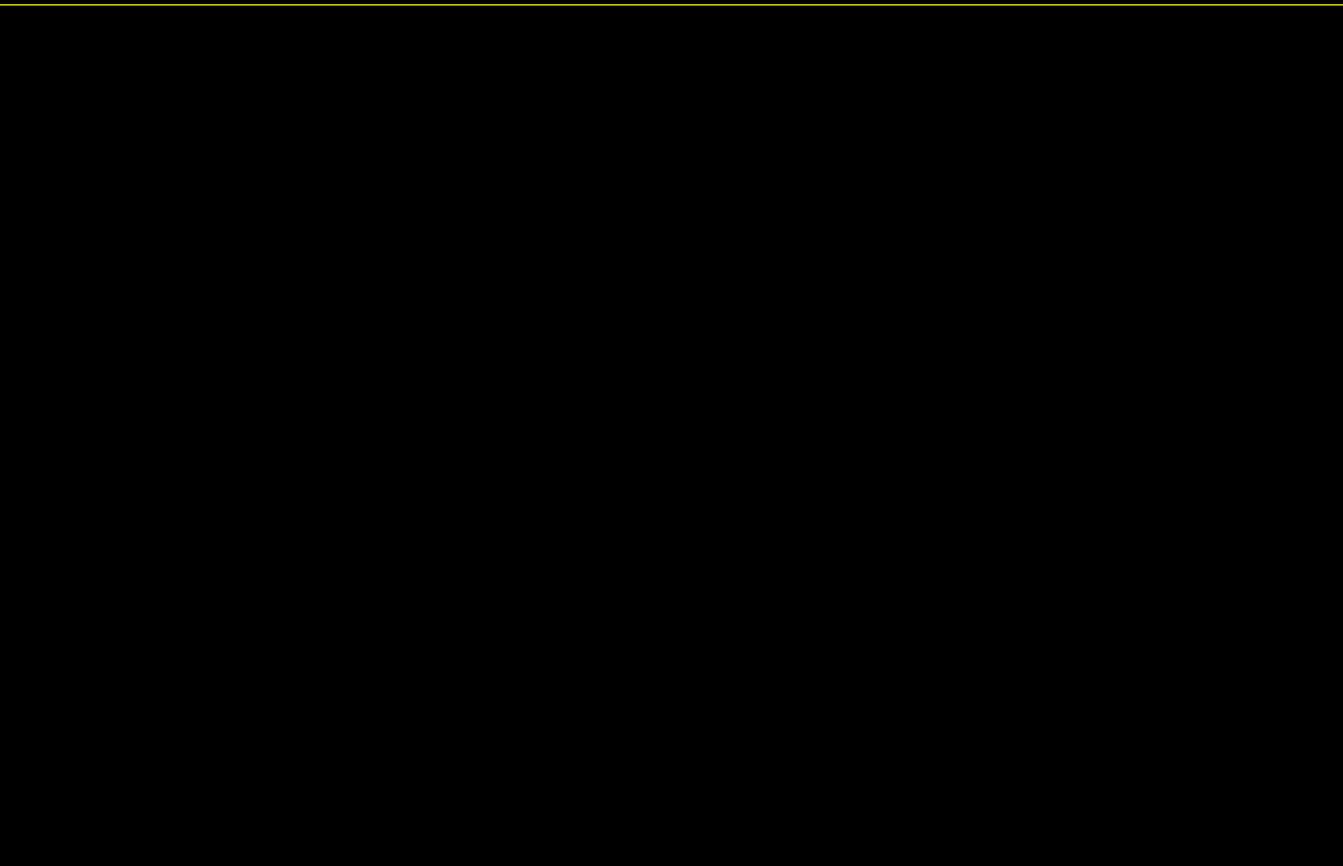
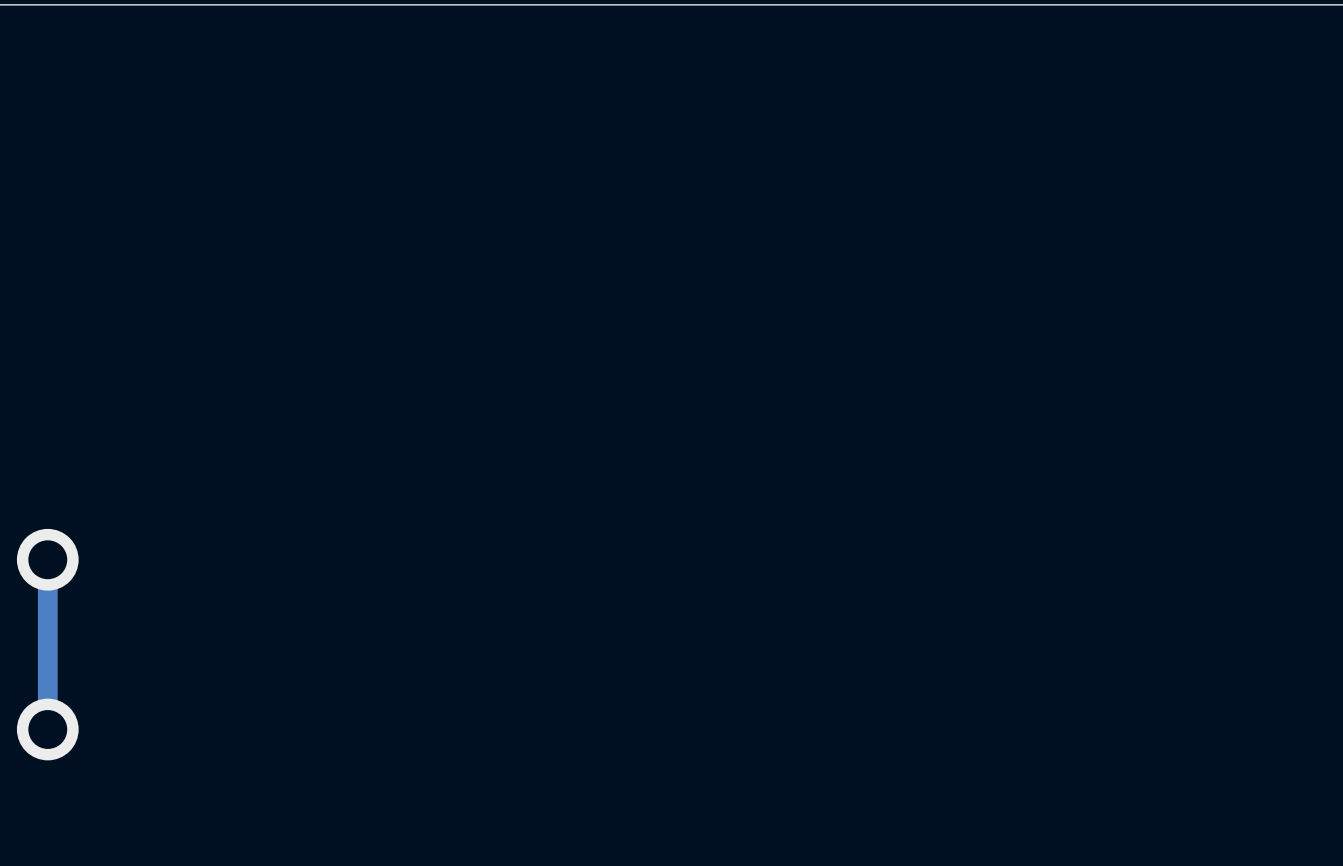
track: none -> (47, 559) (47, 729)
via: none -> (47, 559)
via: none -> (47, 729)

